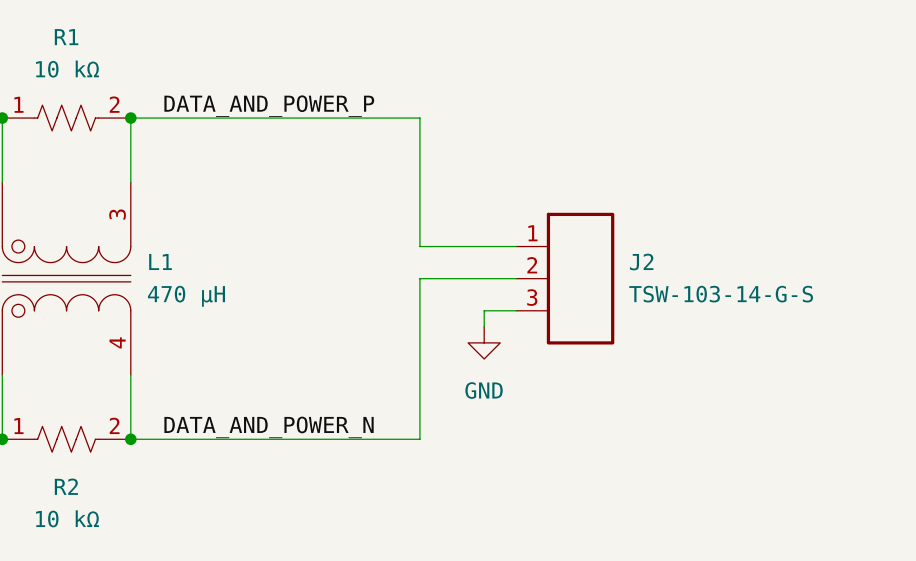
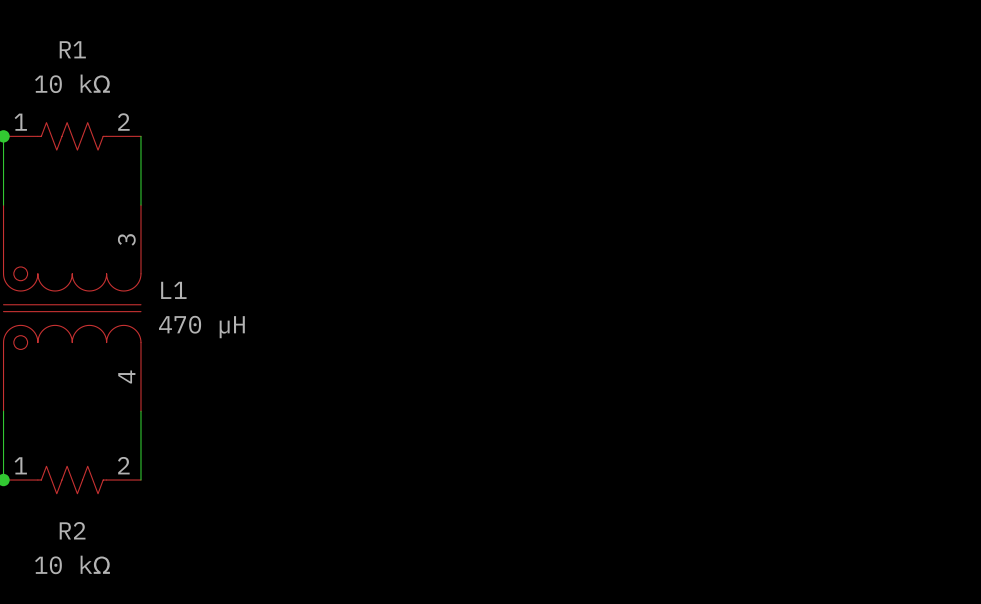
label: DATA_AND_POWER_P (269, 106) -> none
wire: (130, 118) (419, 118) (419, 246) (516, 246) -> none
junction: (130, 118) -> none
wire: (516, 278) (419, 278) (419, 439) (130, 439) -> none
J2: TSW-103-14-G-S (565, 278) -> none
wire: (516, 310) (484, 310) (484, 326) -> none
power symbol: GND (484, 342) -> none
label: DATA_AND_POWER_N (269, 427) -> none
junction: (130, 439) -> none

